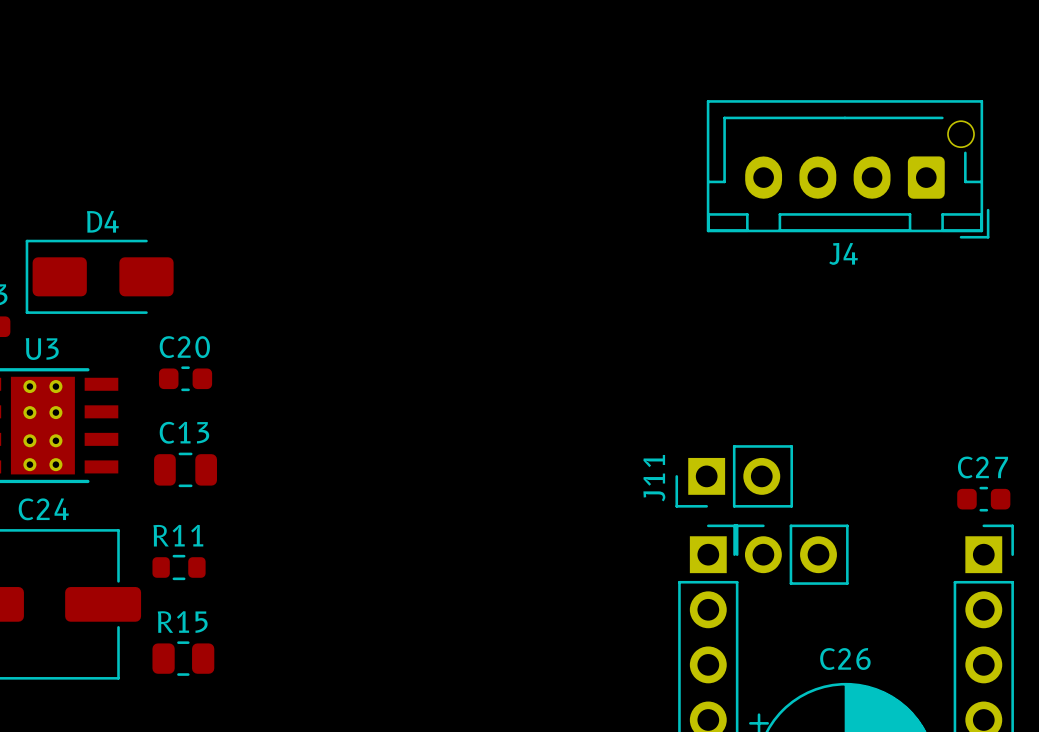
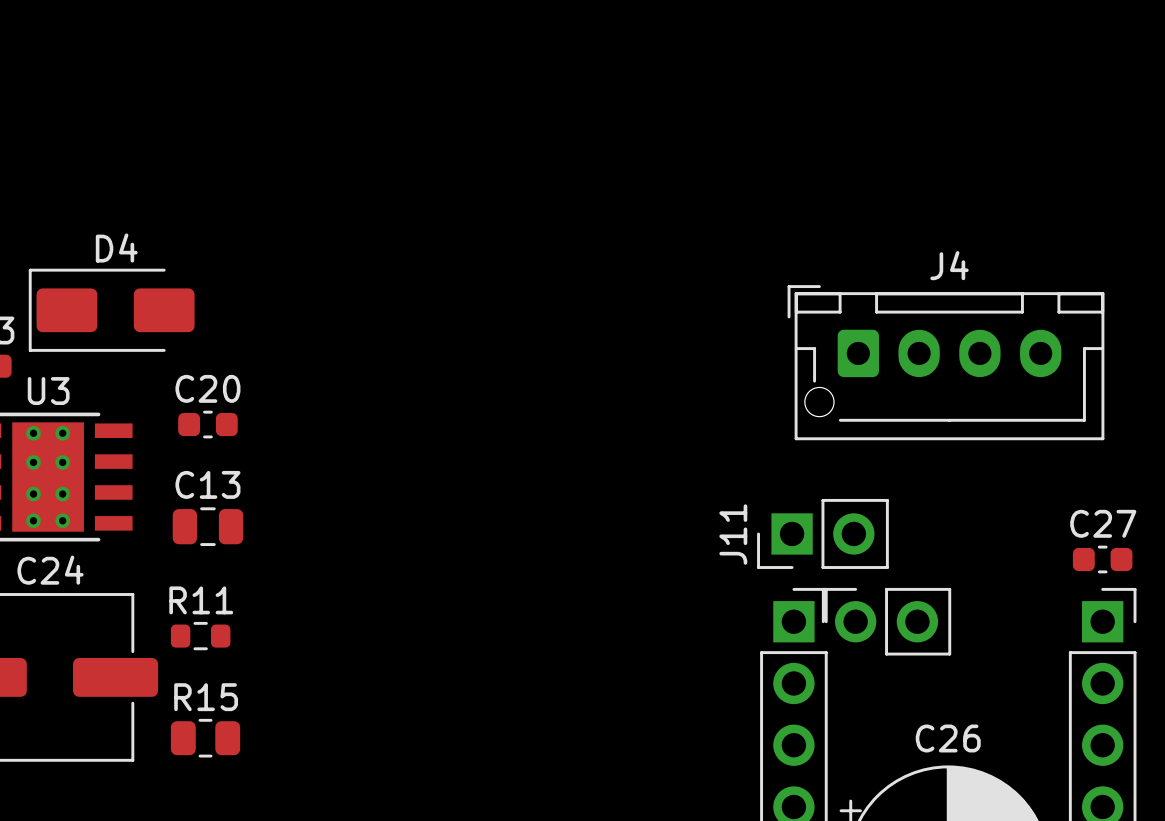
J4 rotation: 0° (848, 169) -> 180° (945, 362)

